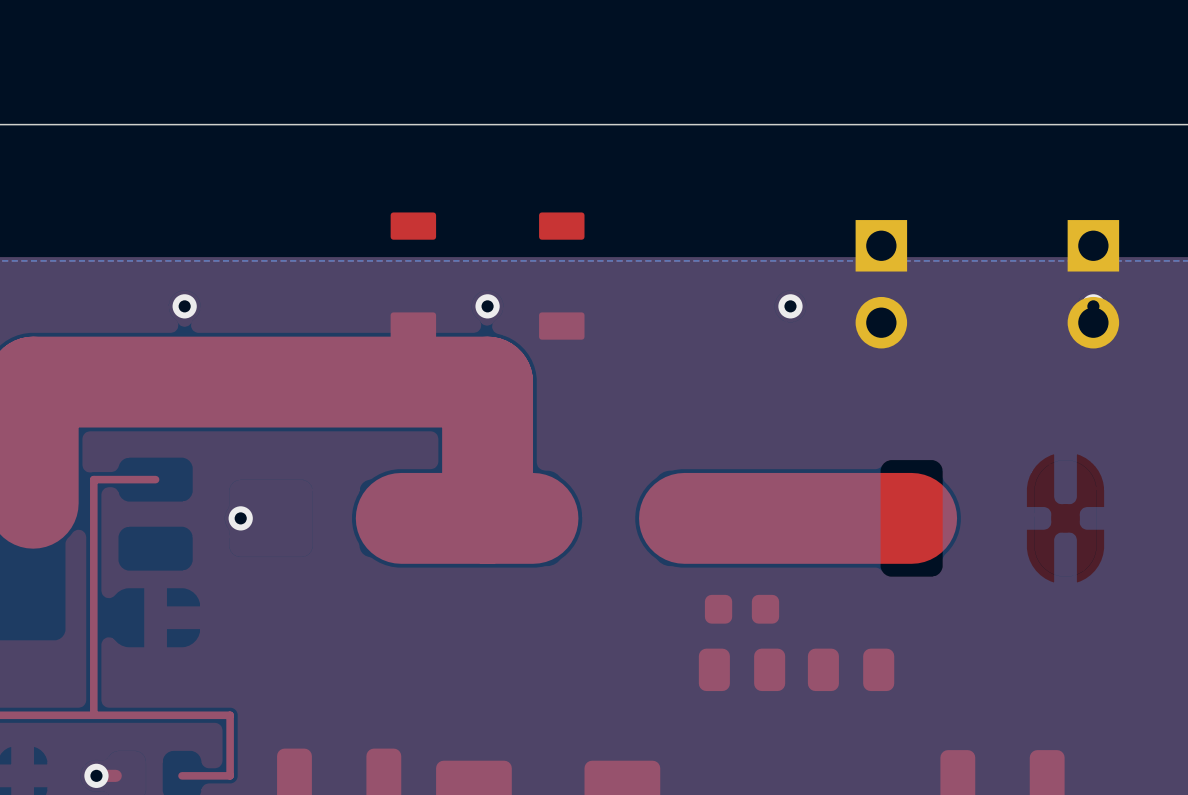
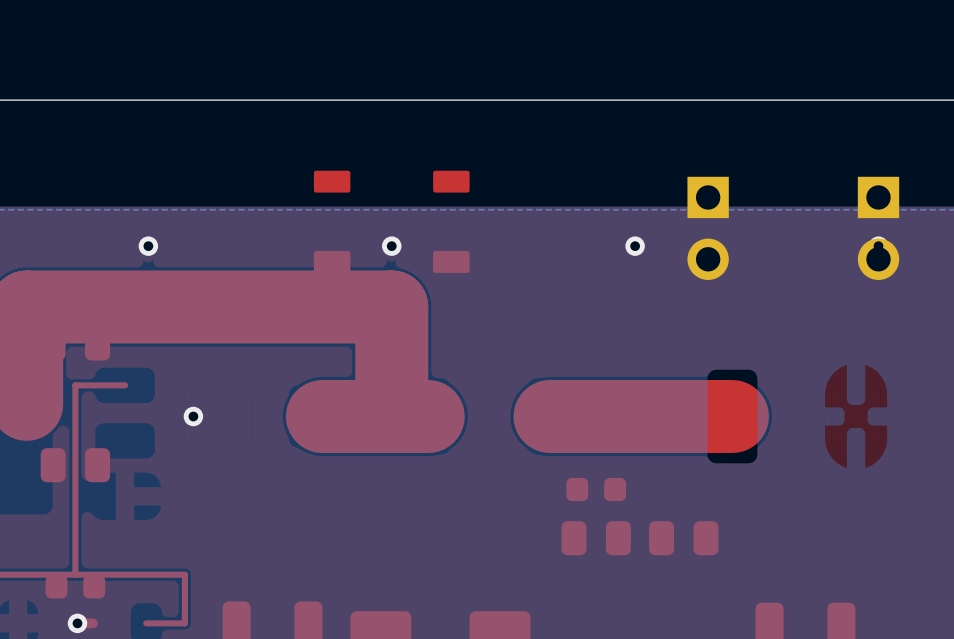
part: none -> (75, 343)
part: none -> (75, 465)
part: none -> (75, 586)

